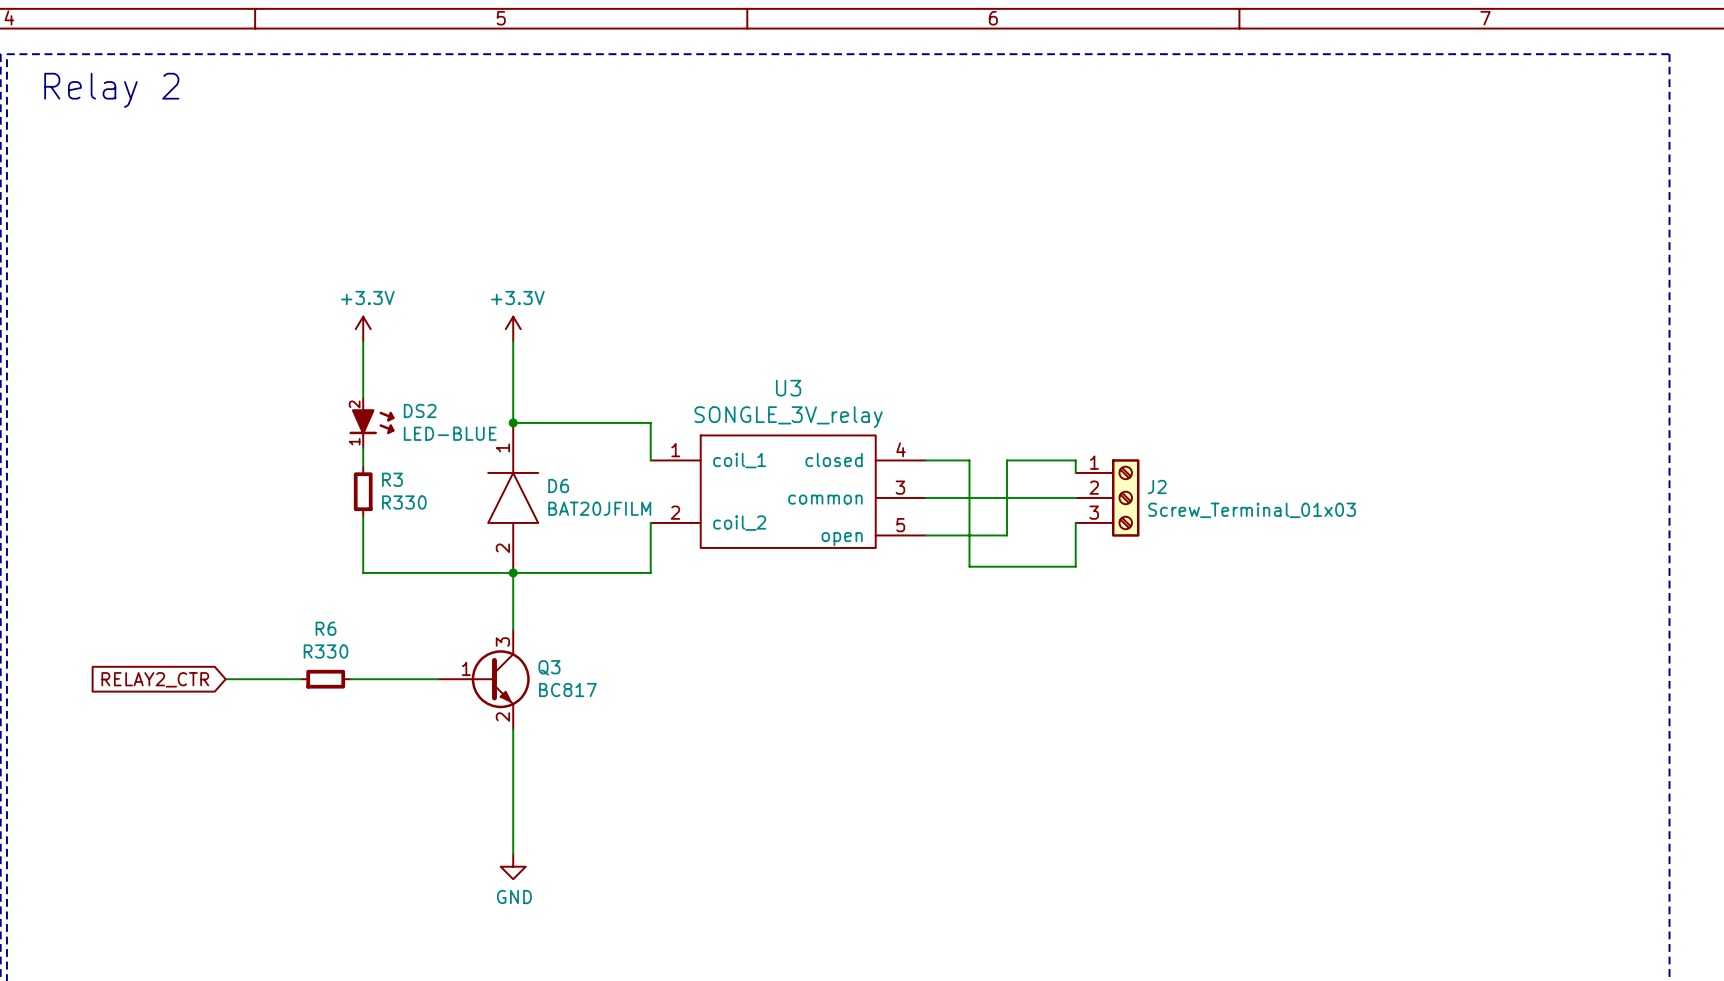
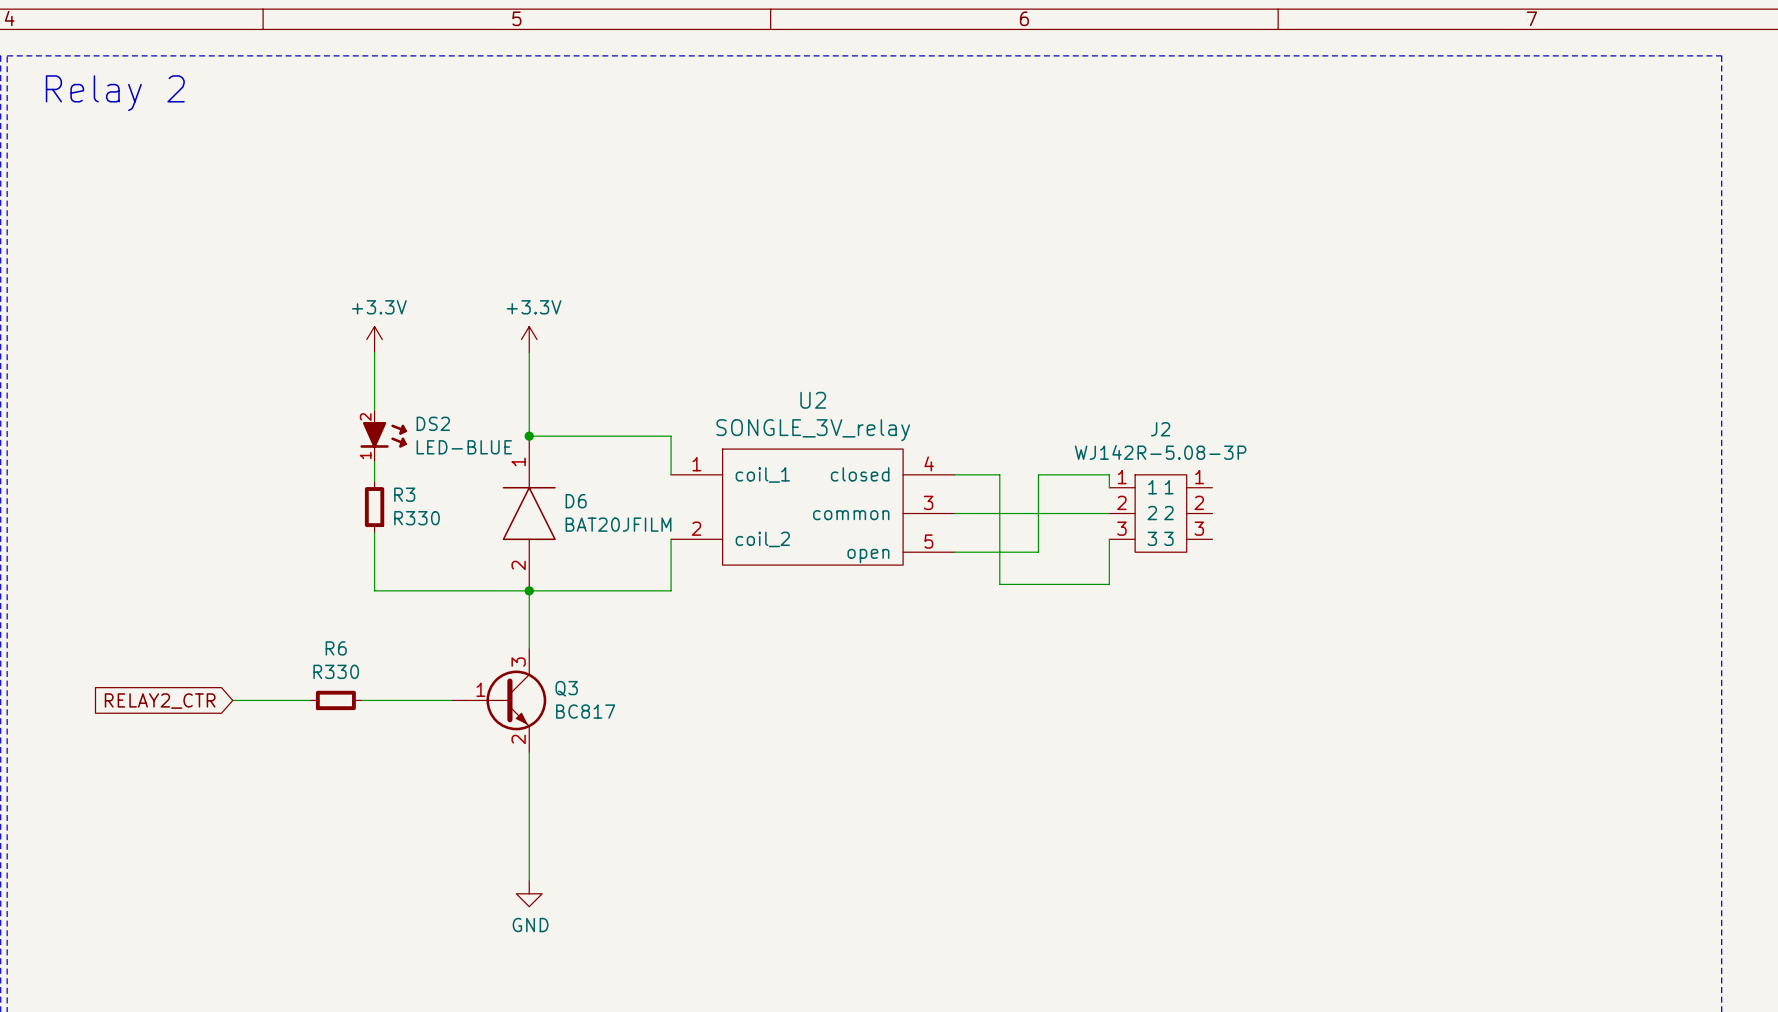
U3 name: U3 (788, 388) -> U2 (813, 400)
J2 symbol: [1075, 459, 1140, 537] -> [1109, 474, 1213, 553]
J2 name position: J2 (1157, 486) -> J2 (1160, 429)
J2 value: Screw_Terminal_01x03 (1252, 510) -> WJ142R-5.08-3P (1160, 452)

